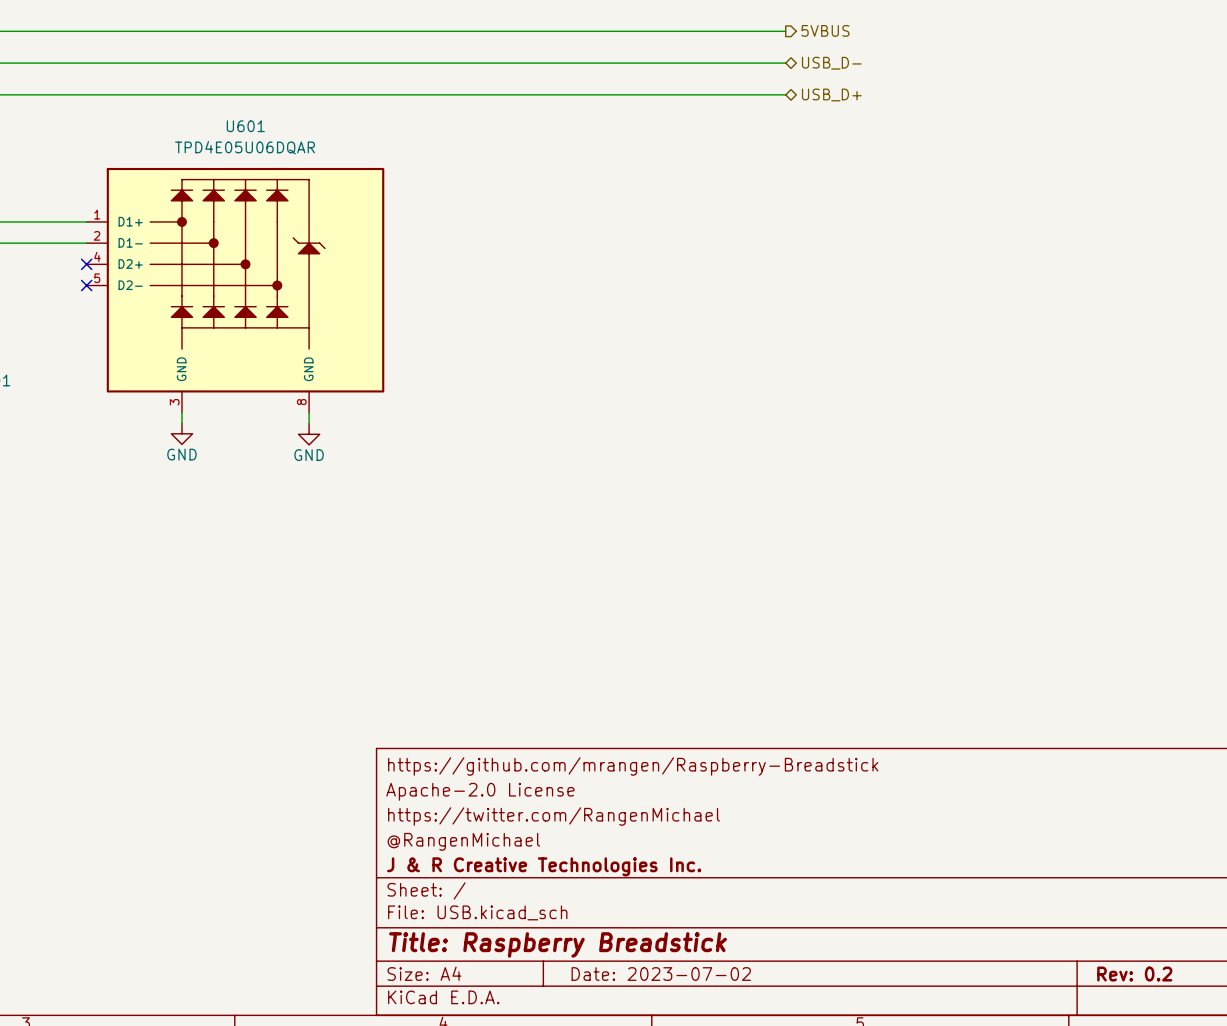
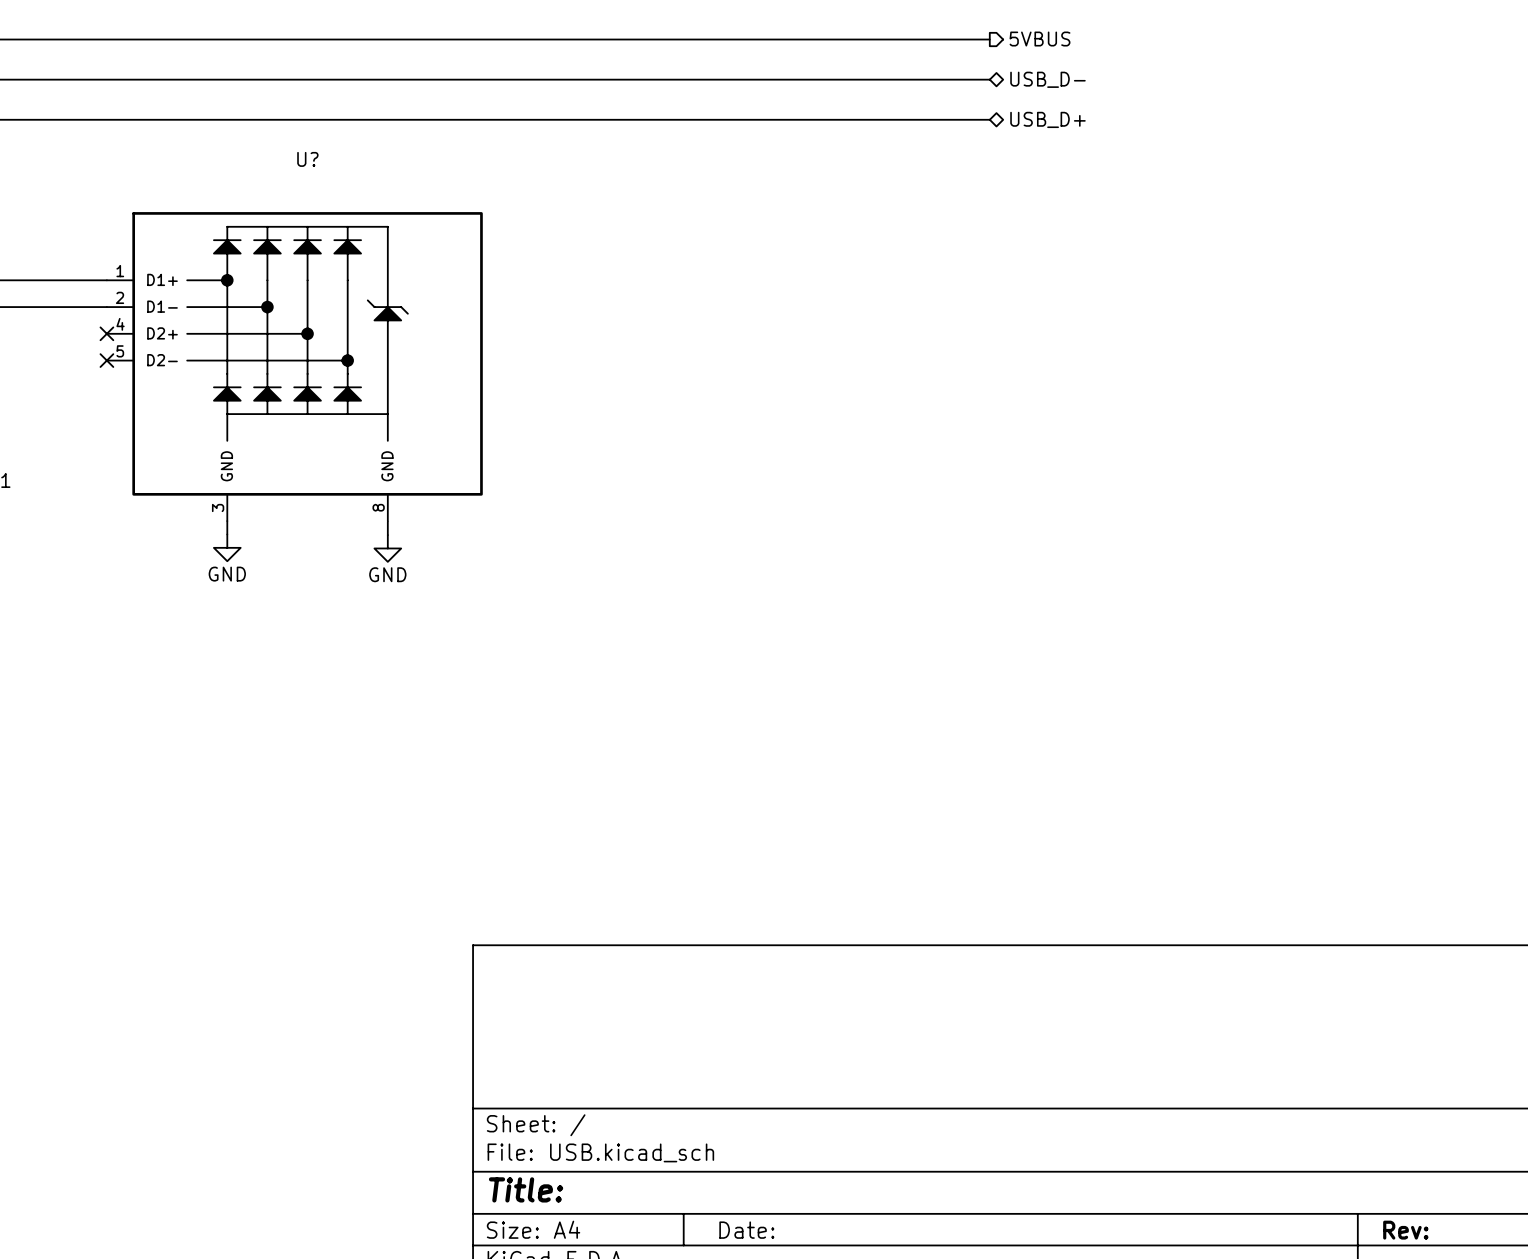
U601 name: U601 (245, 126) -> U? (307, 159)
U601 value: TPD4E05U06DQAR (245, 147) -> none
title block: https://github.com/mrangen/Raspberry-Breadstick (633, 766) -> none
title block: Apache-2.0 License (480, 791) -> none
title block: https://twitter.com/RangenMichael (554, 816) -> none
title block: @RangenMichael (463, 841) -> none
title block: J & R Creative Technologies Inc. (544, 866) -> none
title block: Title: Raspberry Breadstick (558, 944) -> Title: (526, 1189)
title block: Date: 2023-07-02 (661, 974) -> Date: (746, 1230)
title block: Rev: 0.2 (1134, 974) -> Rev: (1405, 1230)

